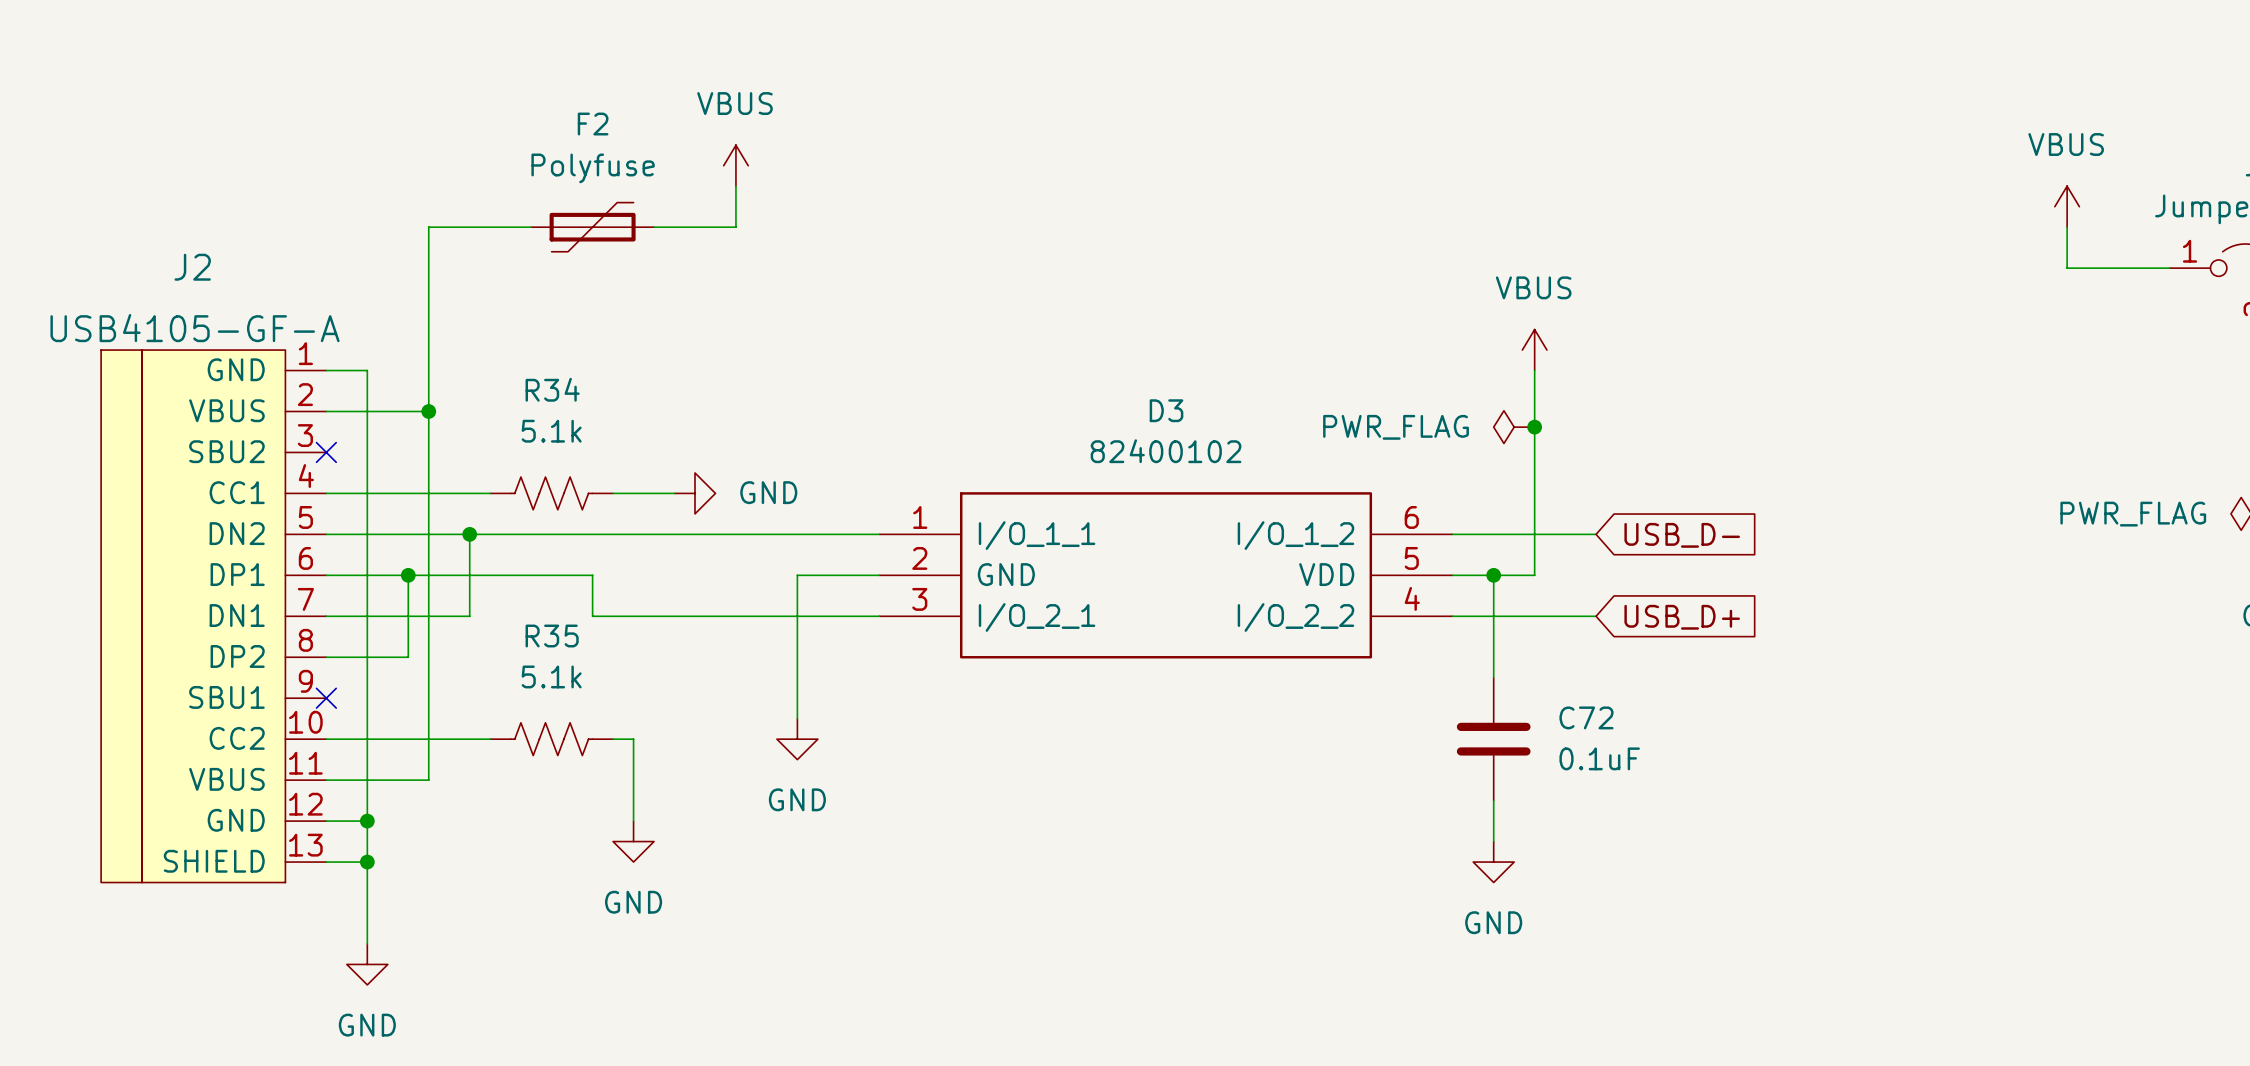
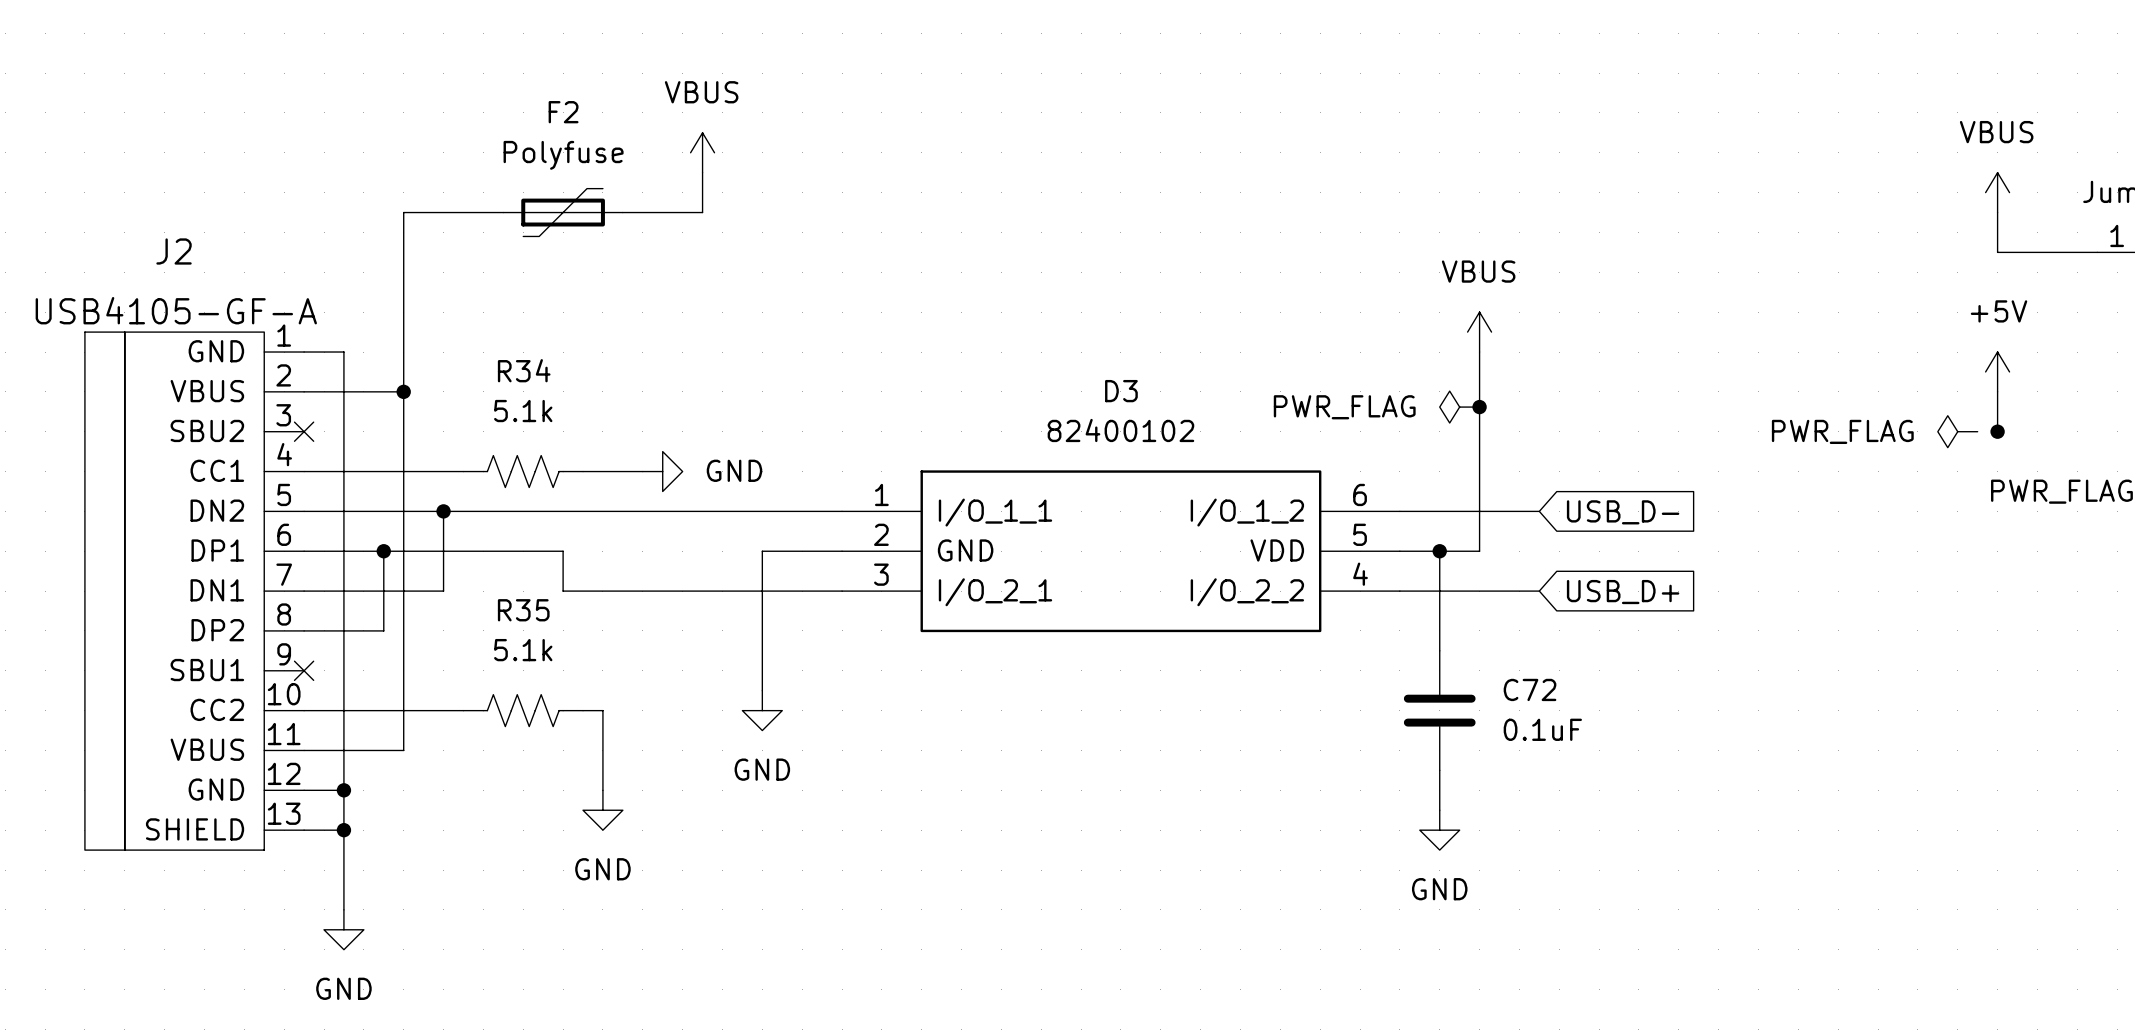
power symbol: none -> +5V (1997, 371)
wire: none -> (1997, 391) (1997, 431)
power symbol: none -> PWR_FLAG (1957, 431)
junction: none -> (1997, 431)

